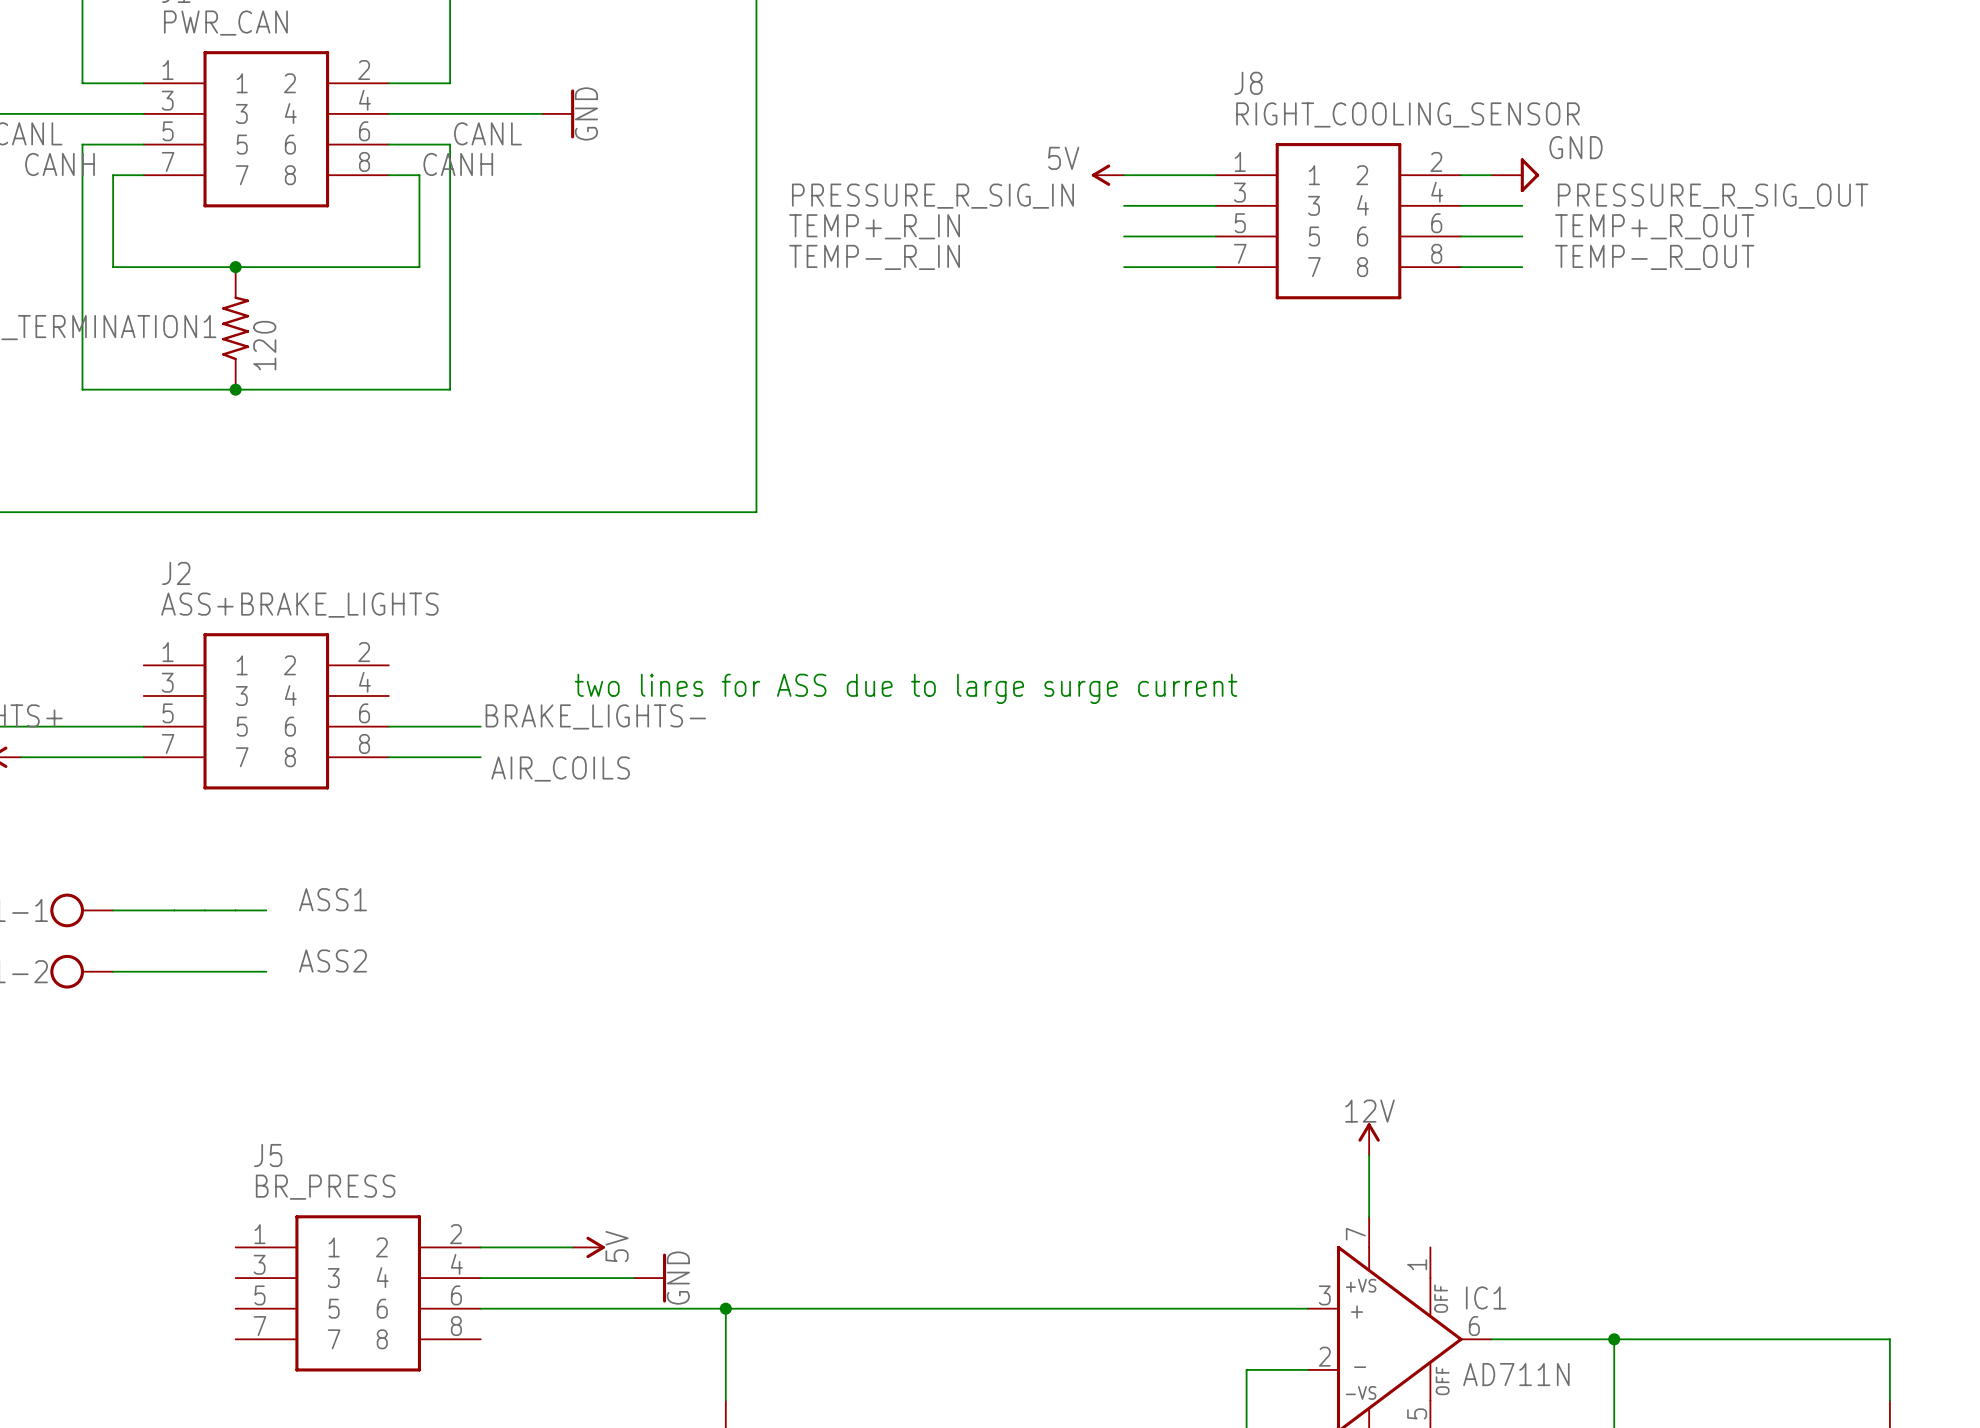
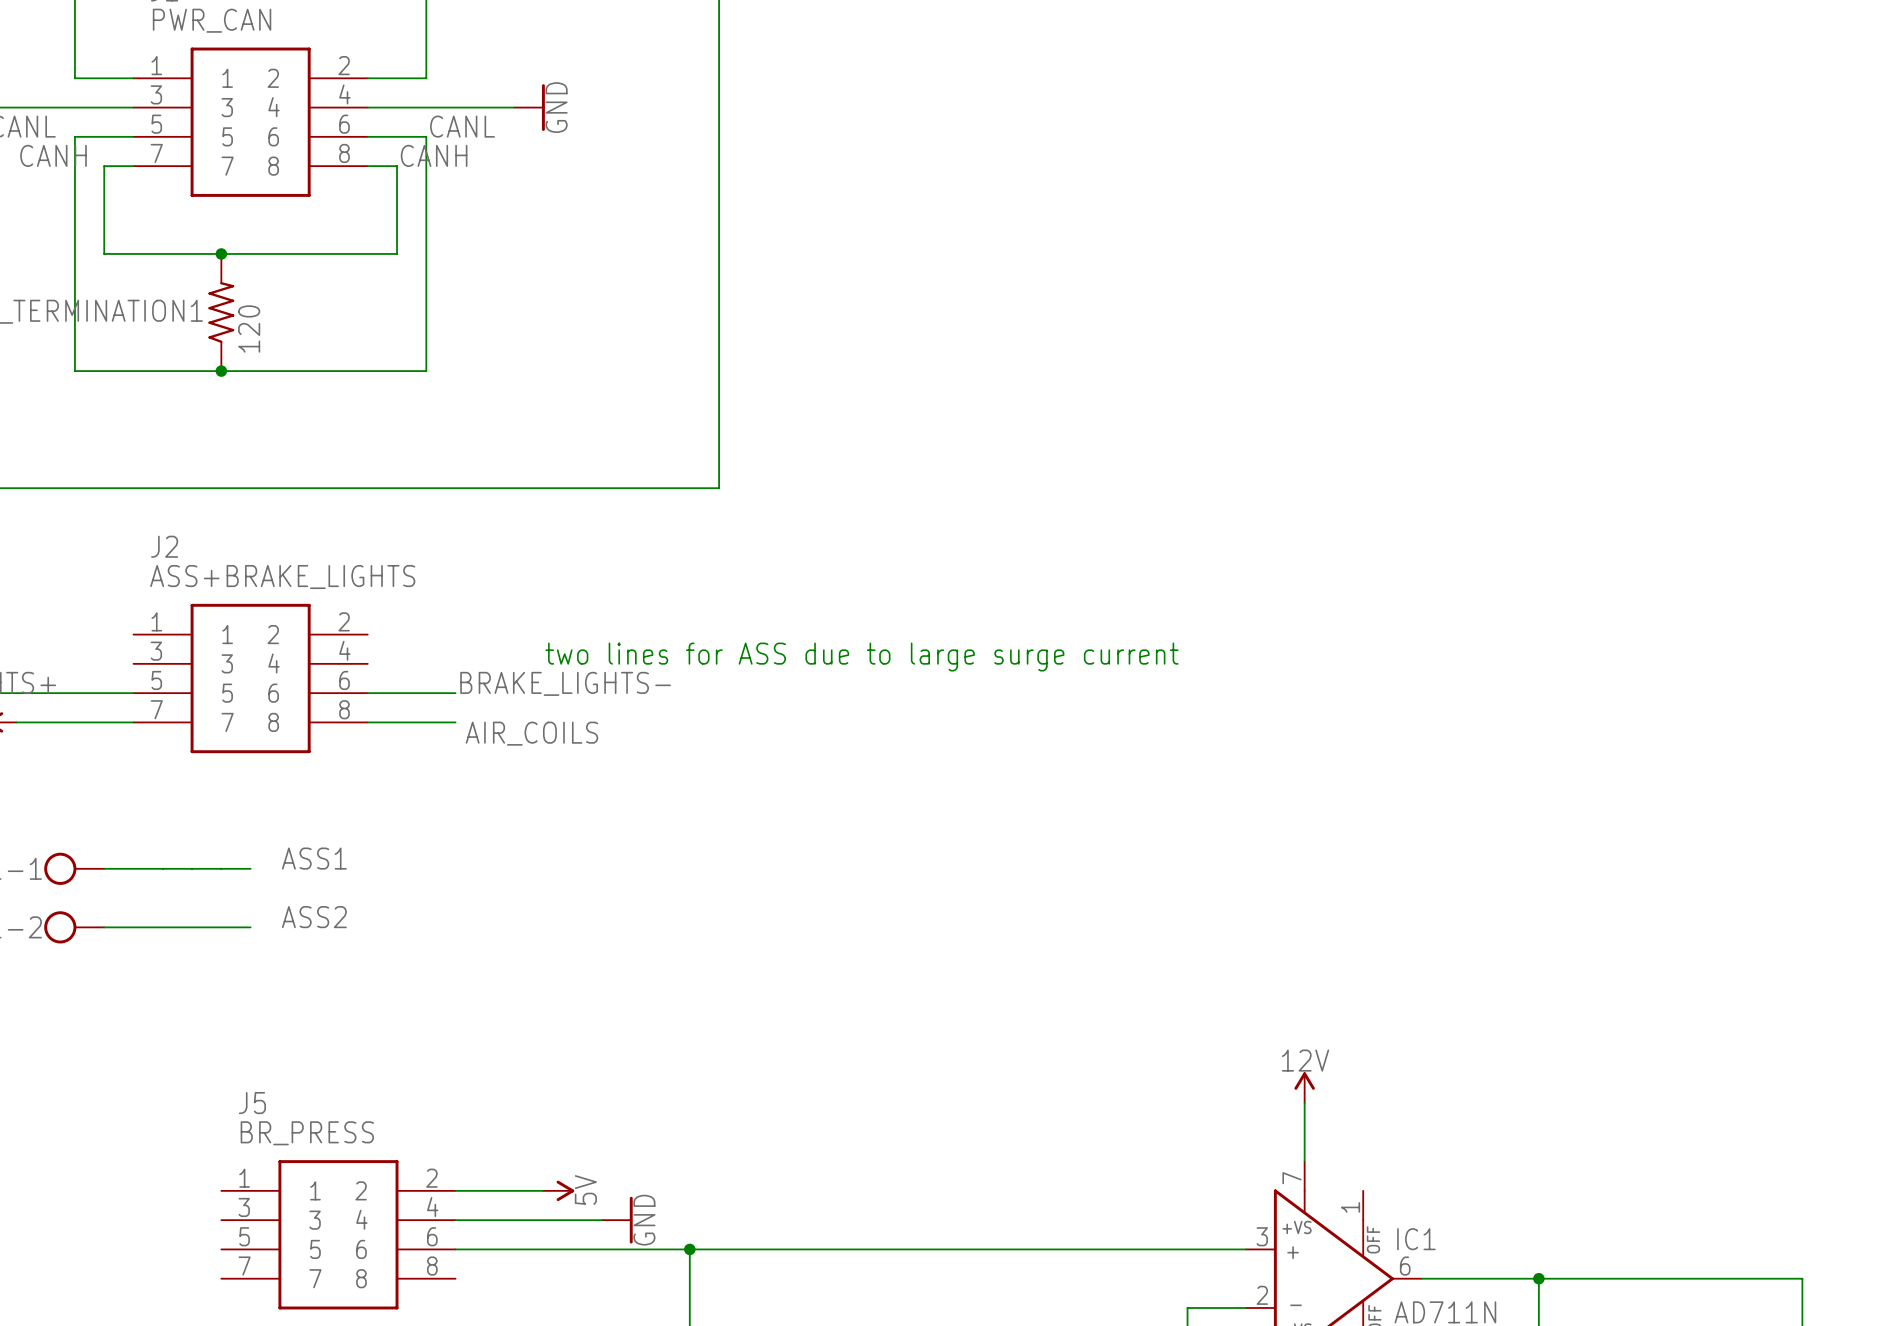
power symbol: 5V (1107, 175) -> none
wire: (1124, 175) (1215, 175) -> none
wire: (1461, 175) (1491, 175) -> none
power symbol: GND (1515, 175) -> none
label: PRESSURE_R_SIG_IN (932, 196) -> none
label: PRESSURE_R_SIG_OUT (1713, 196) -> none
wire: (1124, 205) (1215, 205) -> none
wire: (1461, 205) (1522, 205) -> none
J8: RIGHT_COOLING_SENSOR (1338, 221) -> none
label: TEMP+_R_IN (874, 226) -> none
label: TEMP+_R_OUT (1654, 226) -> none
wire: (1124, 236) (1215, 236) -> none
wire: (1461, 236) (1522, 236) -> none
label: TEMP-_R_IN (874, 257) -> none
label: TEMP-_R_OUT (1654, 257) -> none
wire: (1124, 267) (1215, 267) -> none
wire: (1461, 267) (1522, 267) -> none

